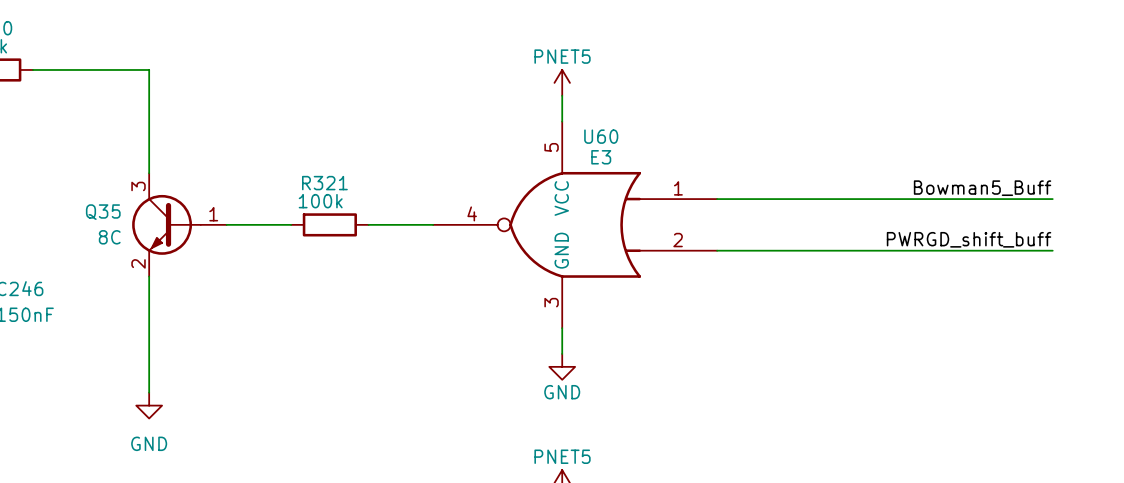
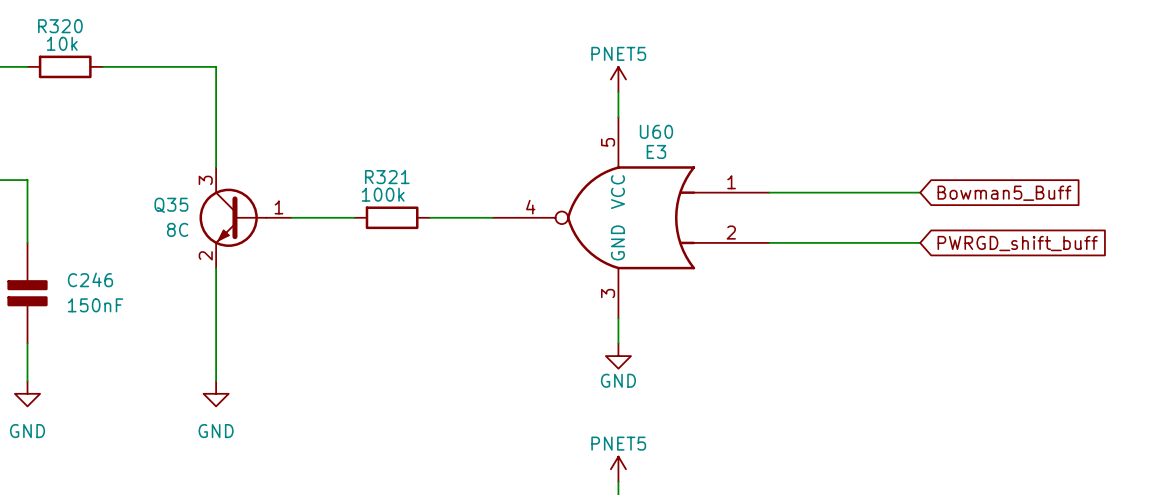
label: Bowman5_Buff (982, 188) -> none
wire: (872, 199) (1052, 199) -> none
global label: none -> Bowman5_Buff (1004, 193)
label: PWRGD_shift_buff (969, 239) -> none
wire: (872, 250) (1052, 250) -> none
global label: none -> PWRGD_shift_buff (1017, 243)

